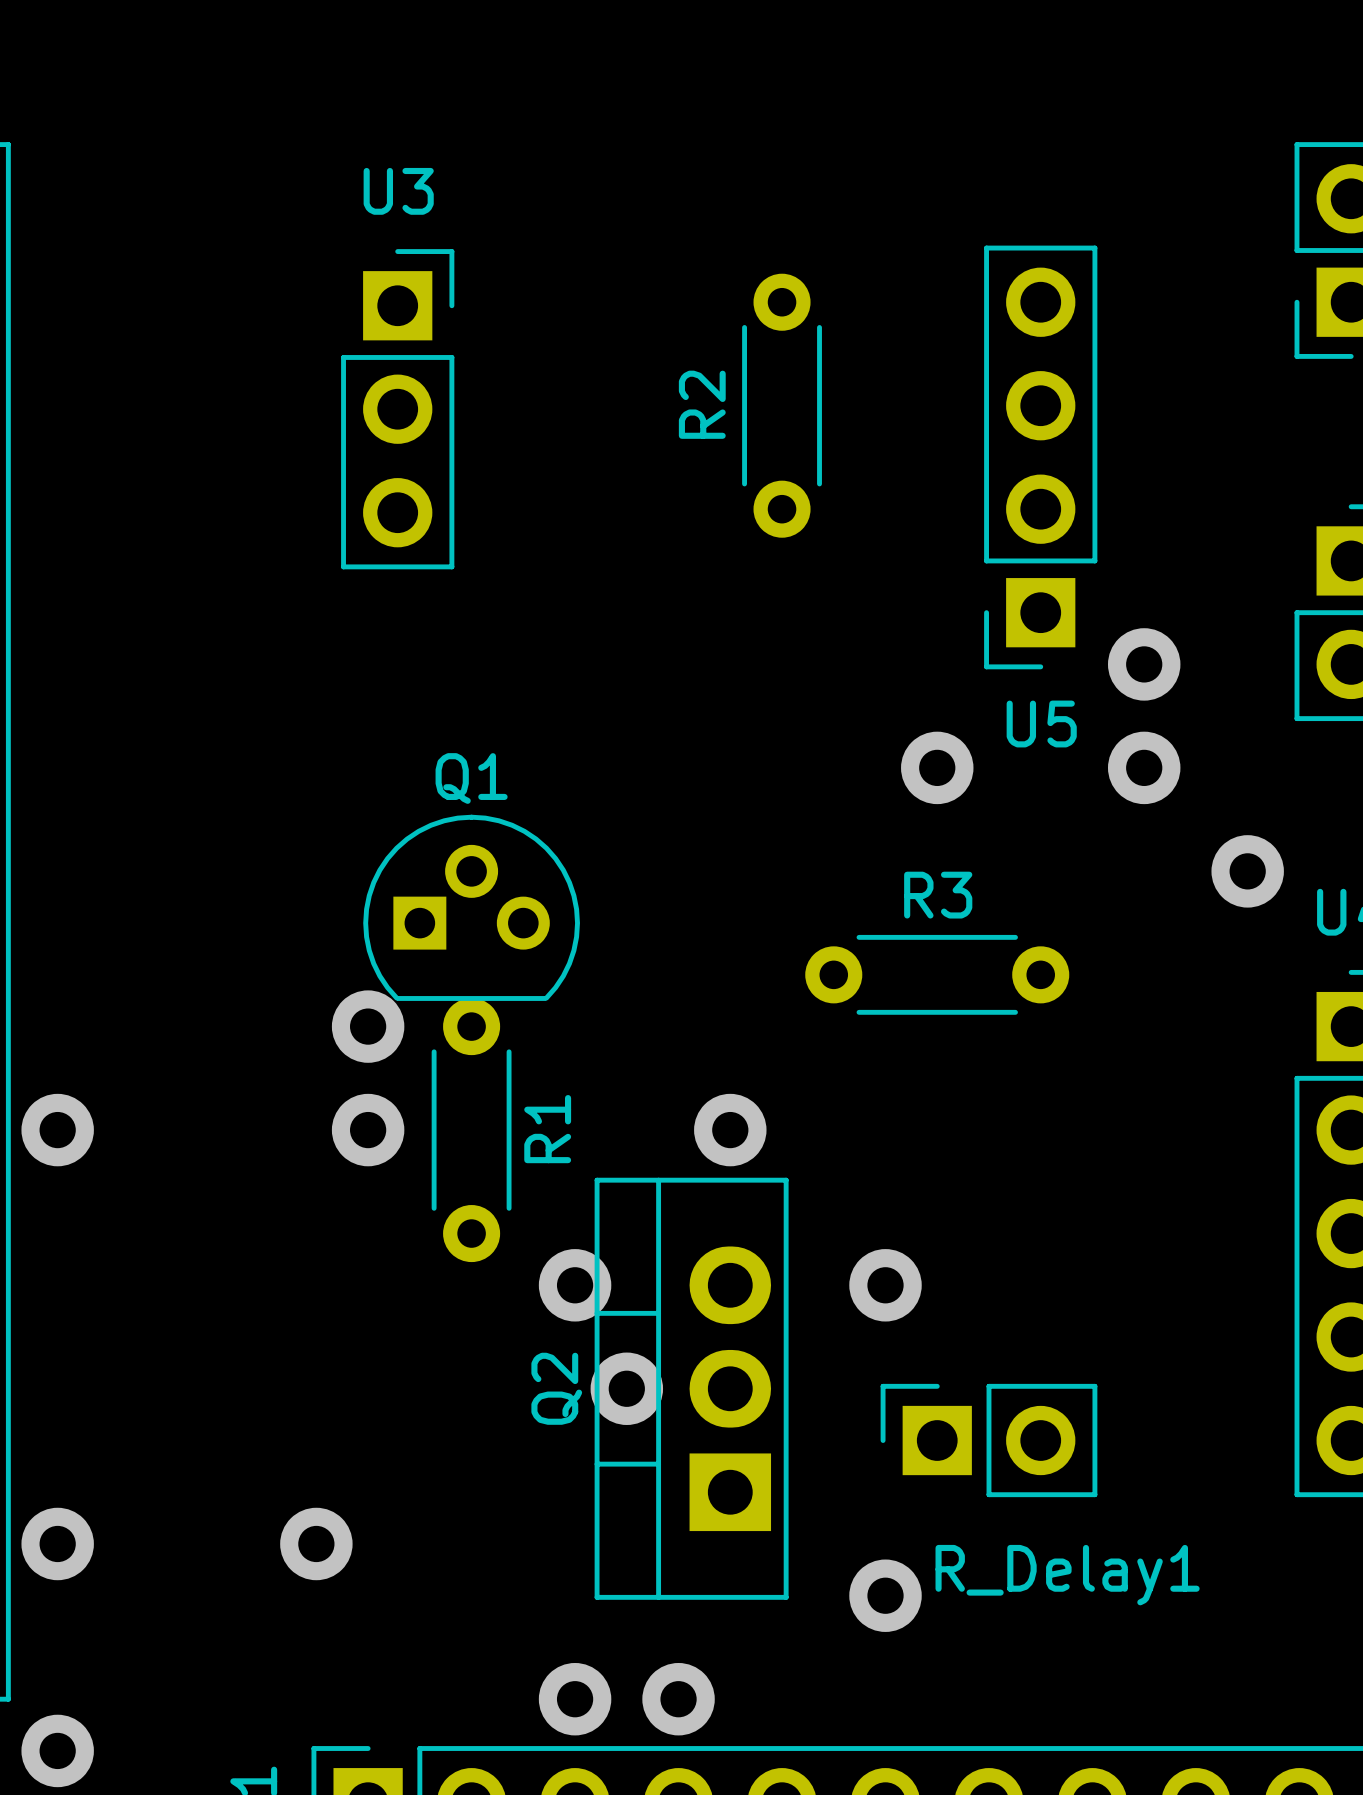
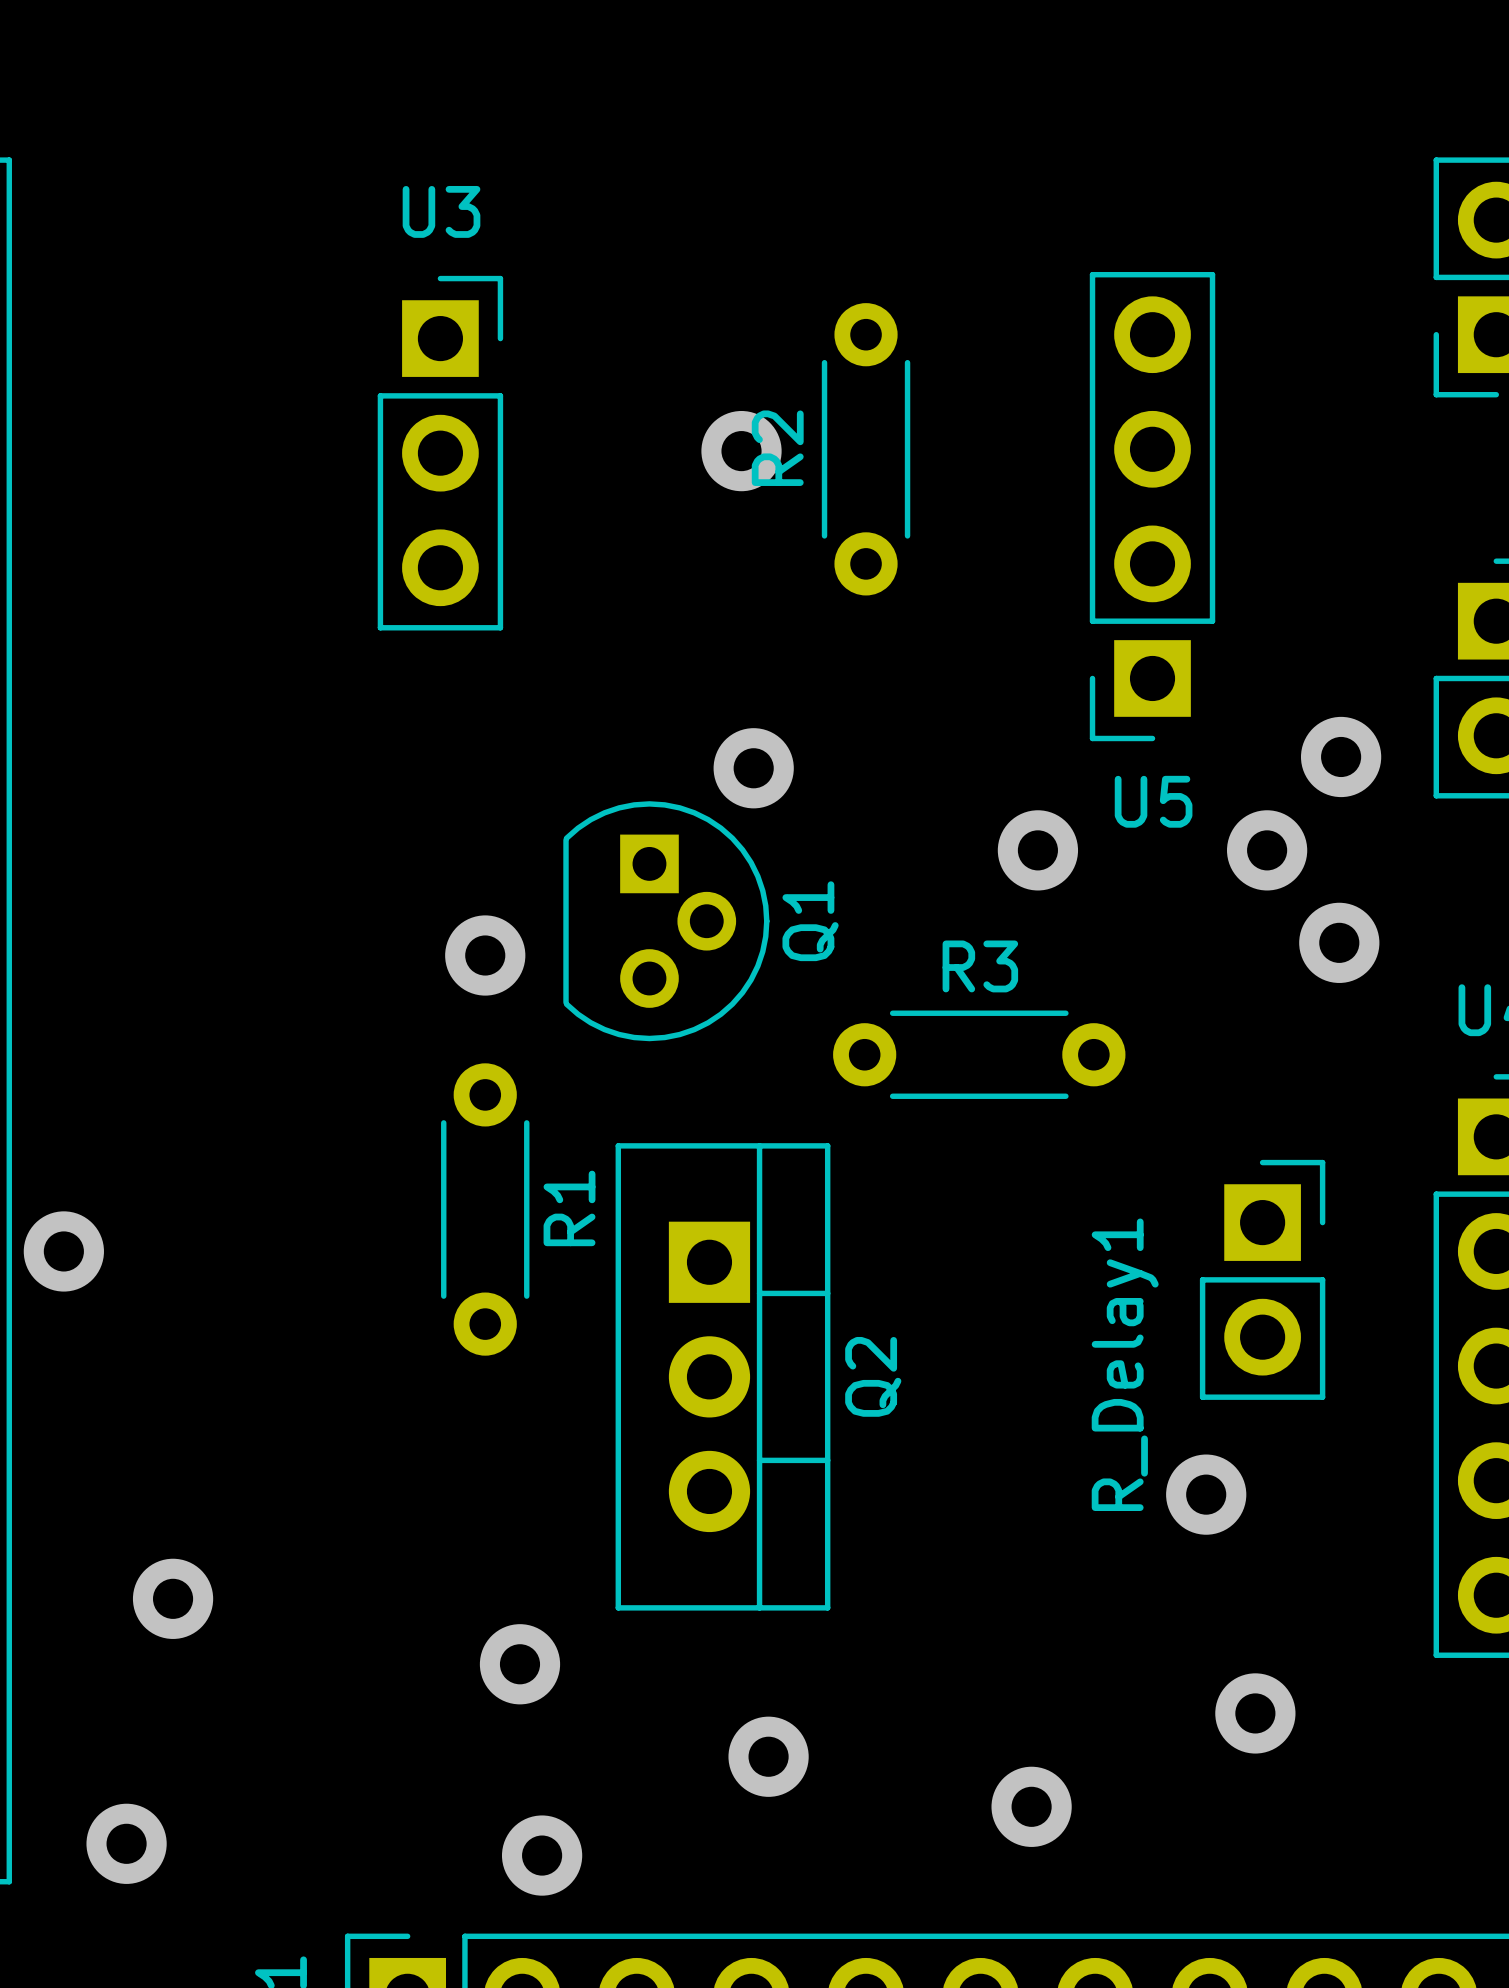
via: none -> (741, 451)
via position: (1144, 664) -> (1341, 756)
via: none -> (753, 768)
via: none -> (485, 955)
via position: (1247, 871) -> (1339, 942)
Q1 rotation: 0° (471, 907) -> 90° clockwise (666, 921)
Q1 position: (471, 907) -> (666, 921)
R3 position: (937, 974) -> (979, 1054)
via: (368, 1026) -> none
via: (368, 1130) -> none
R1 position: (471, 1130) -> (485, 1209)
via: (730, 1130) -> none
Q2 footprint: [594, 1177, 789, 1600] -> [615, 1143, 831, 1611]
via: (575, 1285) -> none
via: (885, 1285) -> none
via: none -> (1206, 1494)
Q2 name position: Q2 (556, 1388) -> Q2 (873, 1376)
via: (626, 1388) -> none
R_Delay1 rotation: 0° (988, 1440) -> 90° clockwise (1262, 1279)
R_Delay1 position: (988, 1440) -> (1262, 1279)
via: none -> (173, 1598)
via: none -> (519, 1664)
via: (57, 1543) -> none
via: (316, 1543) -> none
via: none -> (1255, 1713)
via: none -> (768, 1756)
via position: (885, 1595) -> (1031, 1806)
via: none -> (126, 1843)
via: none -> (542, 1855)
via: (575, 1699) -> none
via: (678, 1699) -> none
via: (57, 1750) -> none

